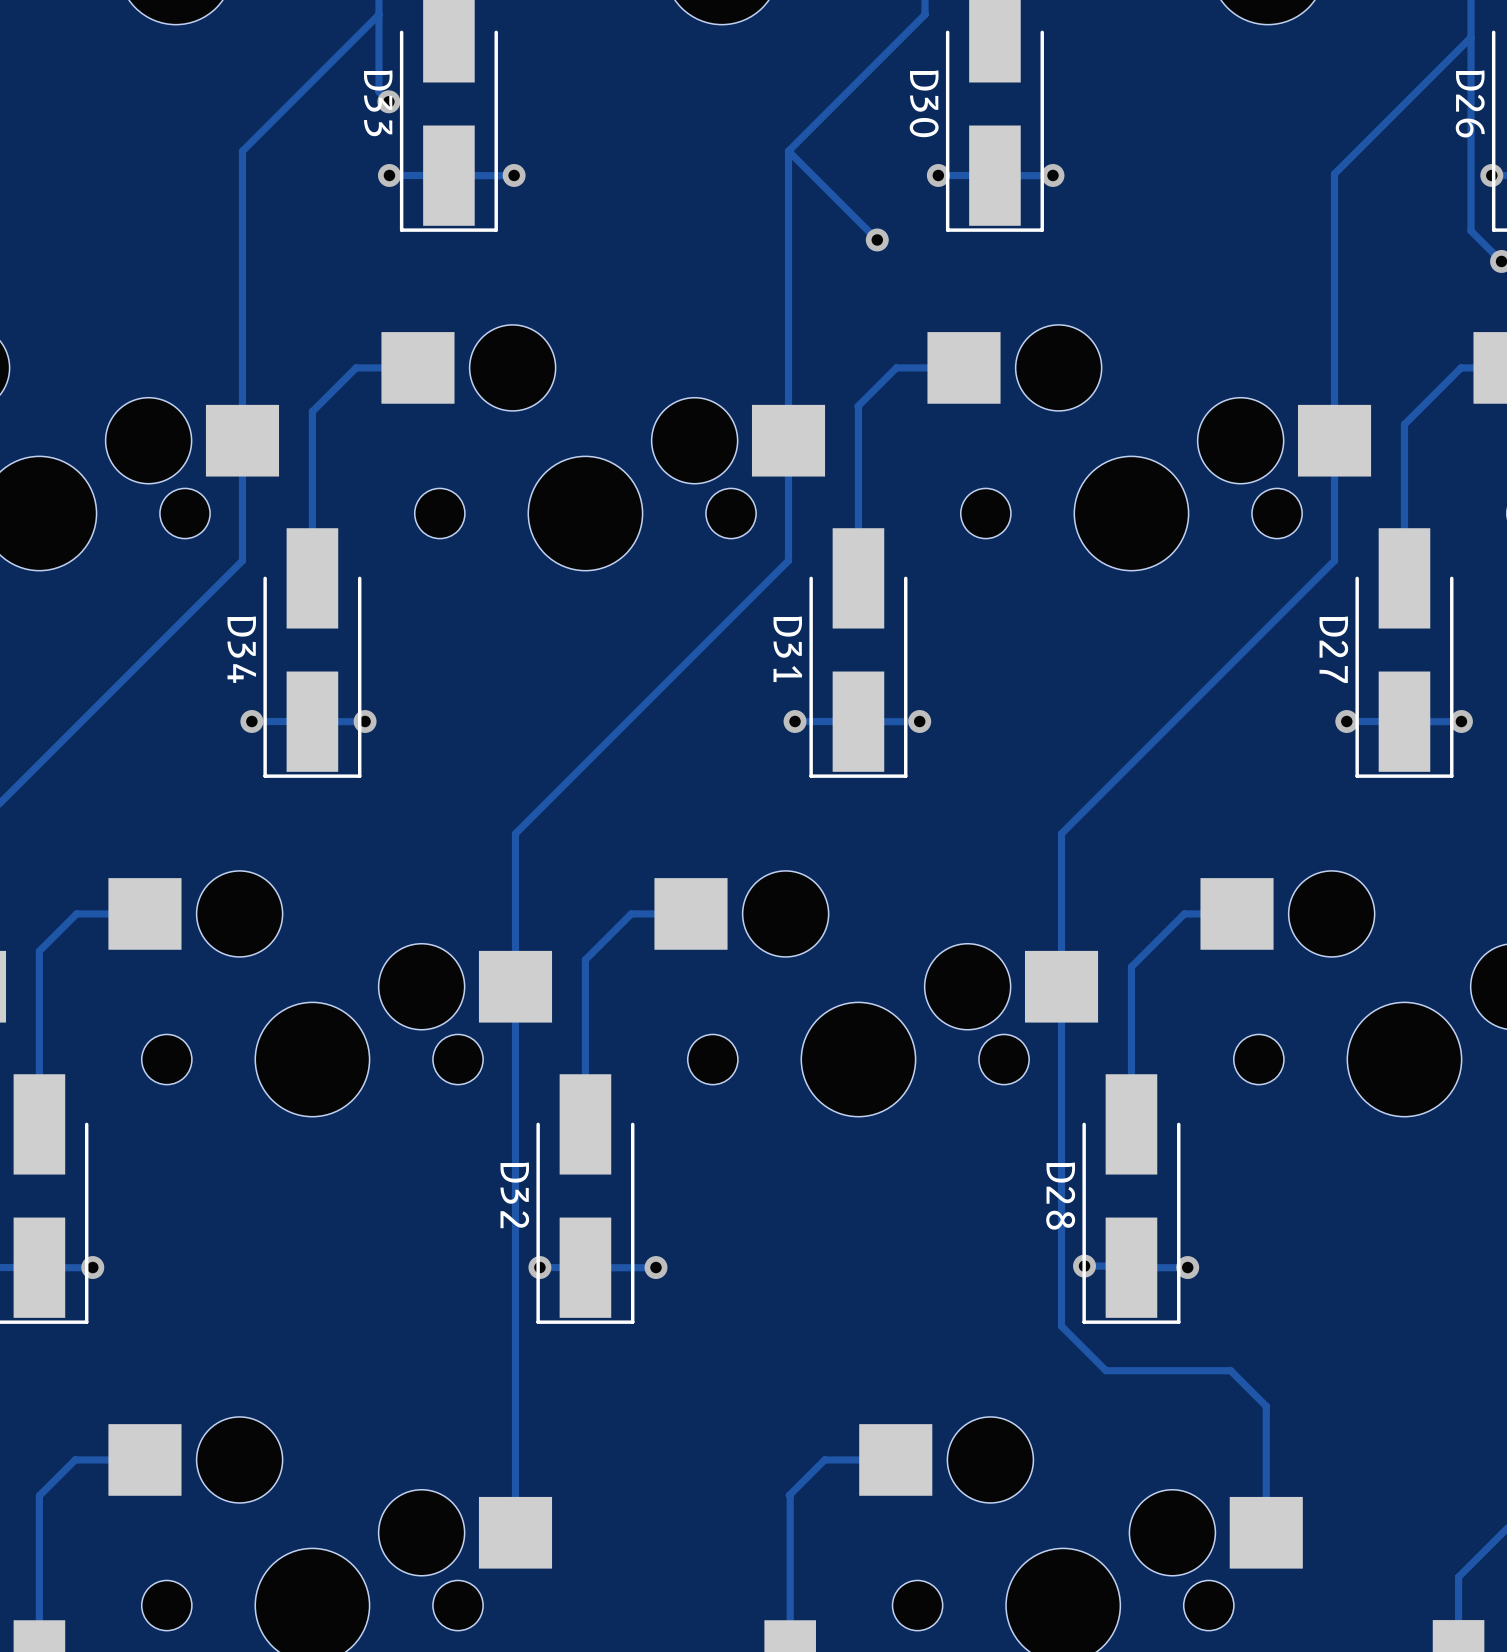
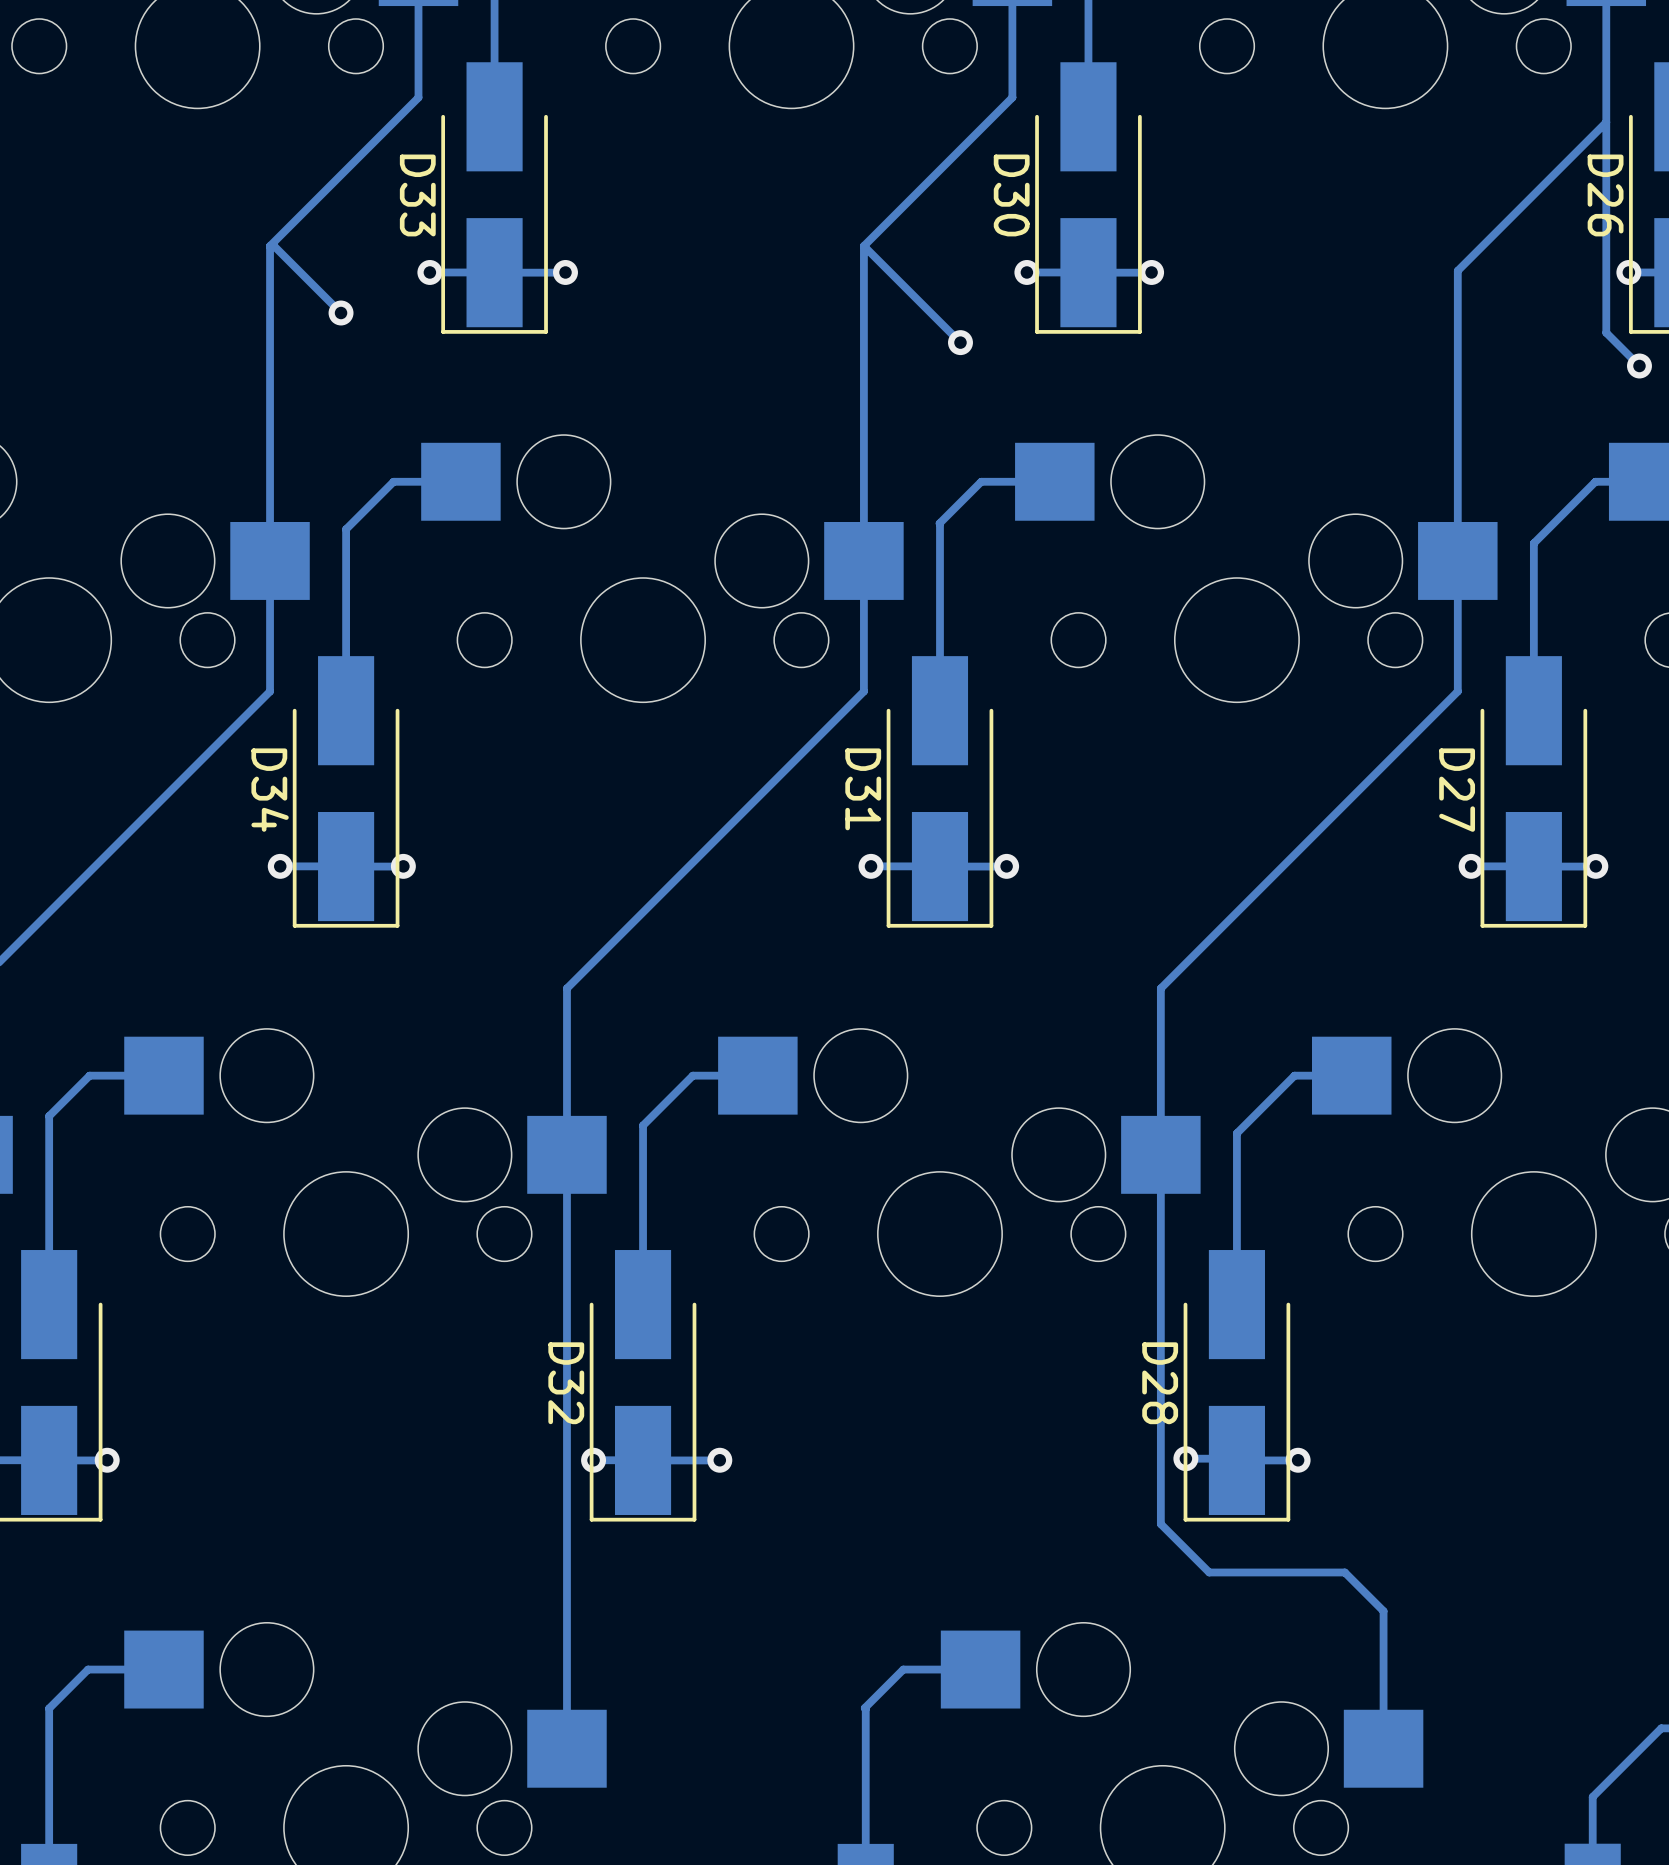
track: (378, 14) (378, 91) (388, 101) -> none
via position: (388, 101) -> (341, 313)
track: none -> (270, 246) (274, 246) (341, 313)

